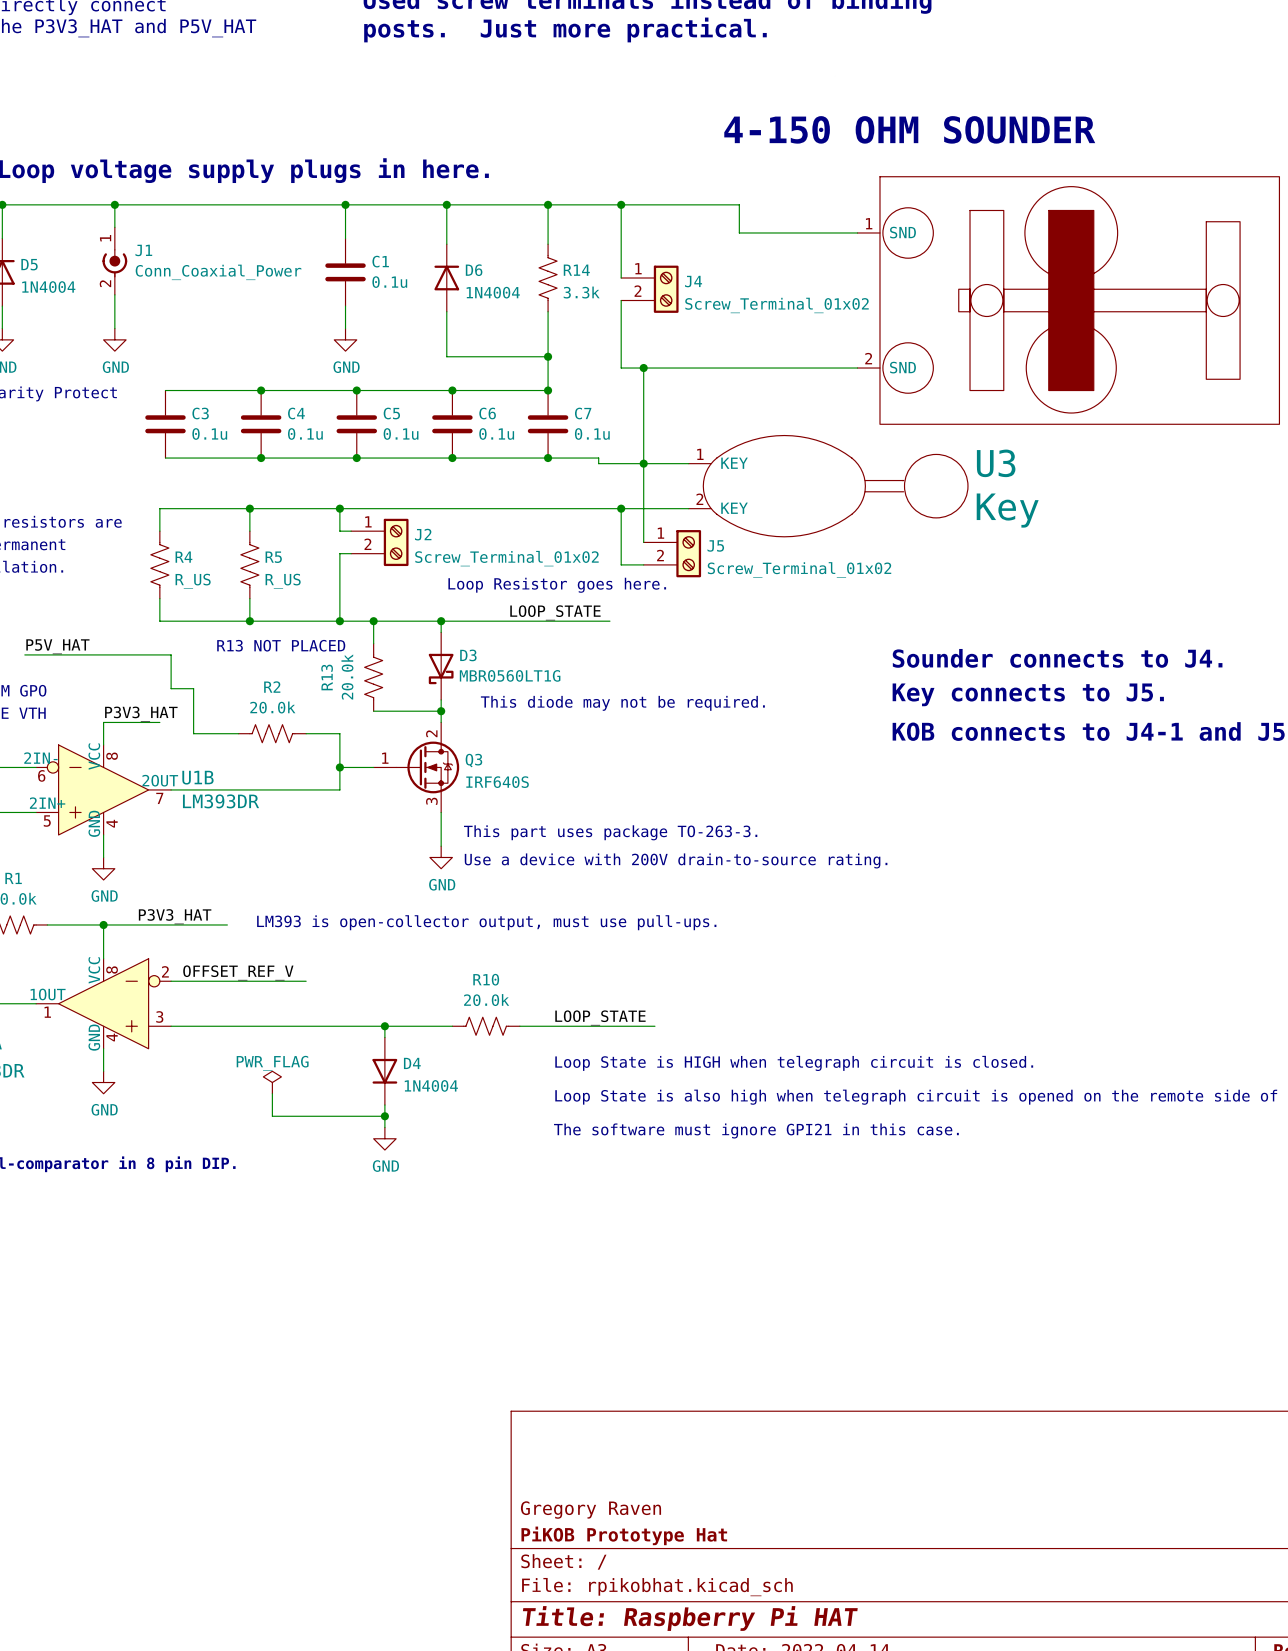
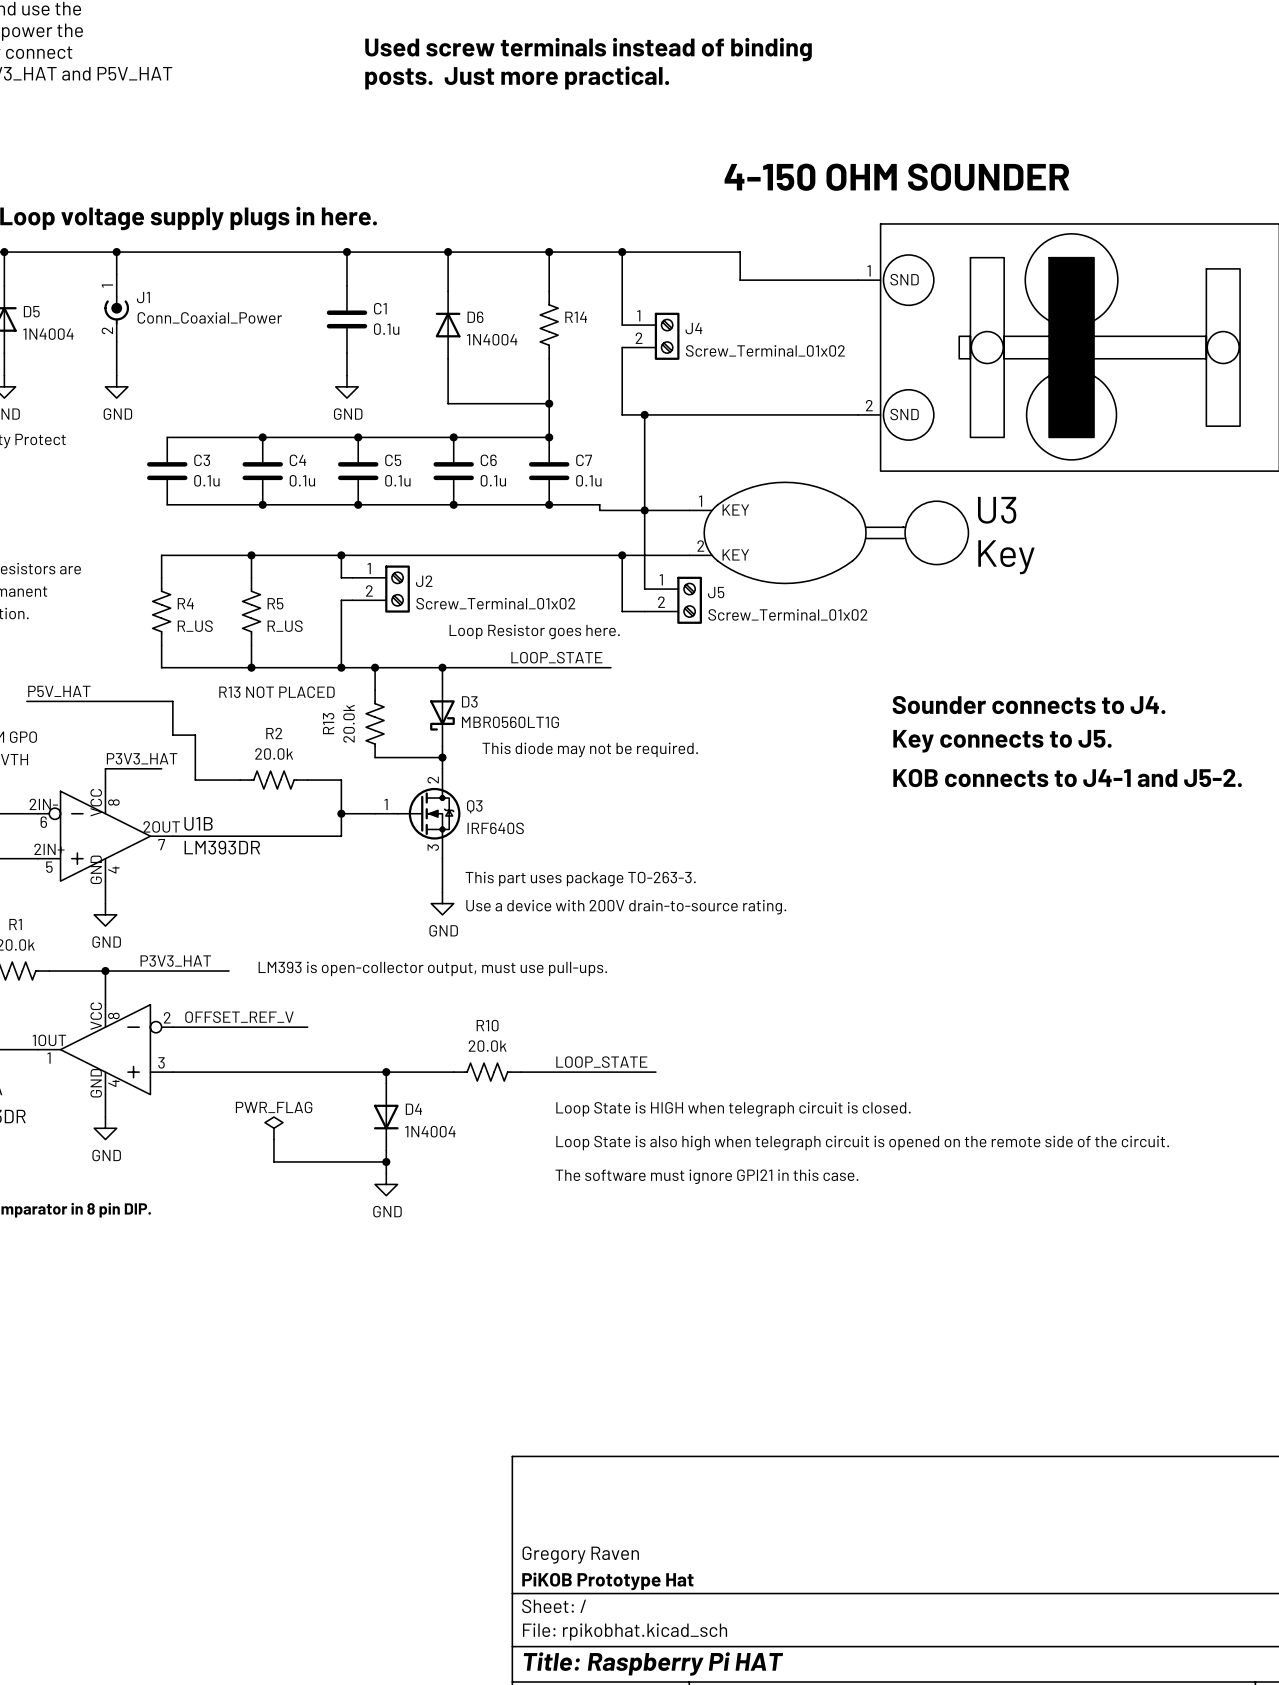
R14 value: 3.3k (581, 292) -> none

